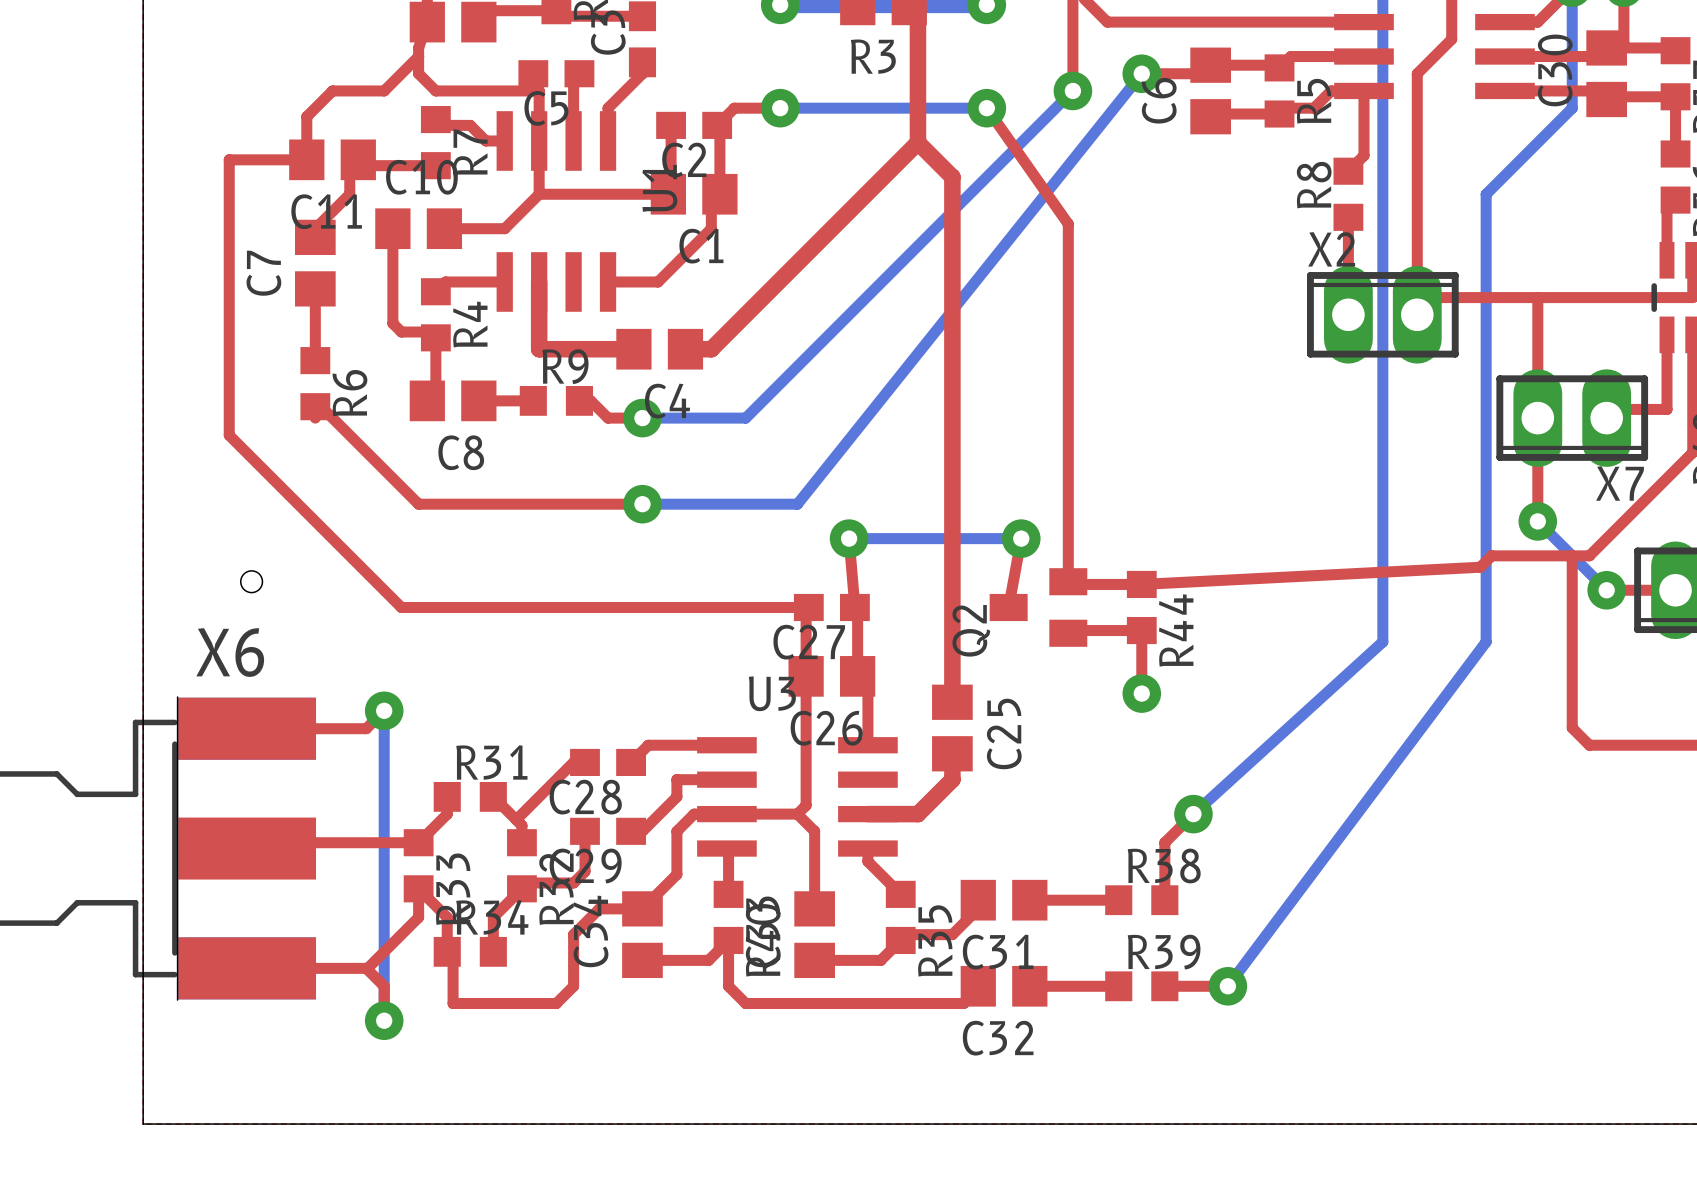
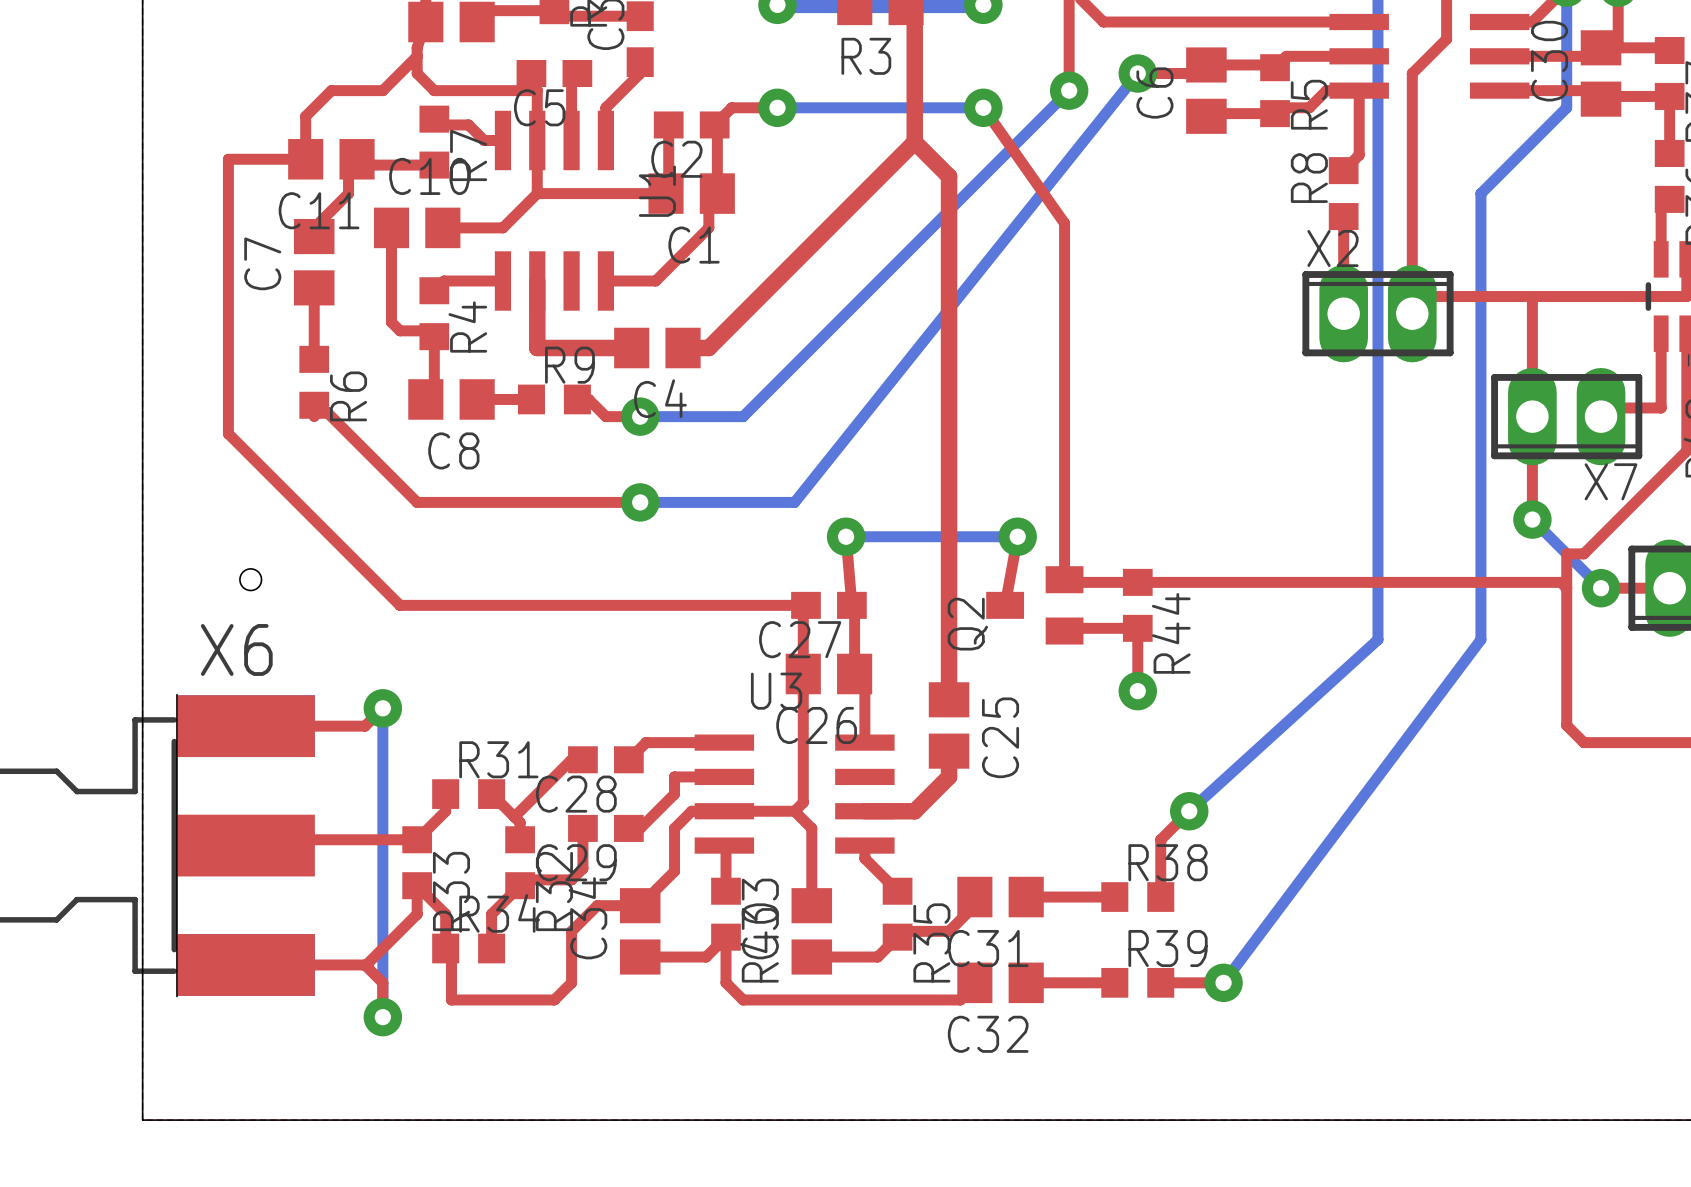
top track: (1572, 555) (1491, 555) (1480, 567) (1141, 584) -> (1566, 588) (1560, 582) (1137, 582)

